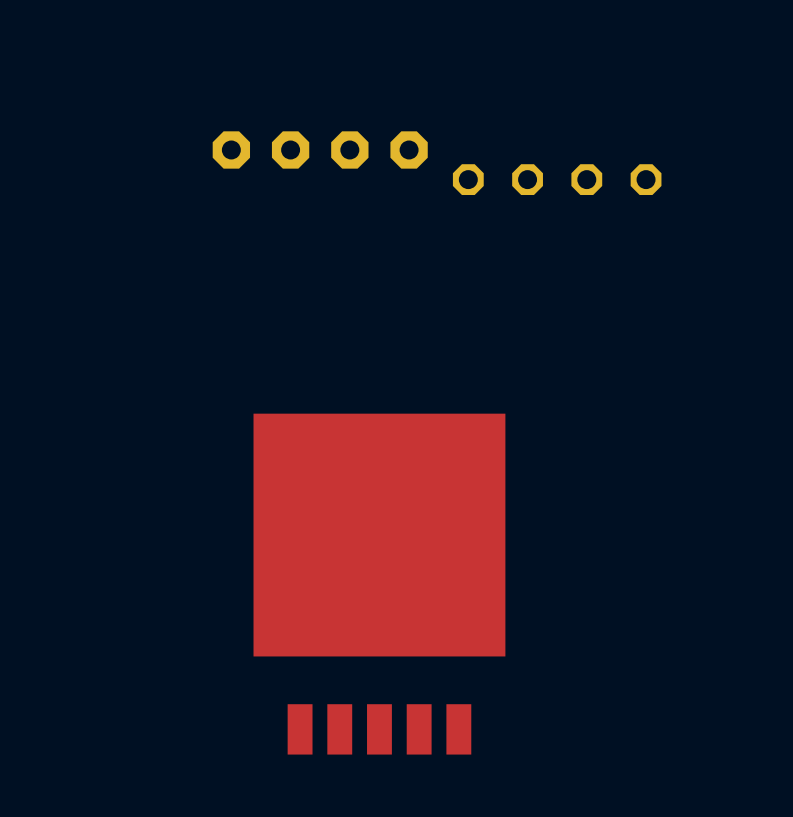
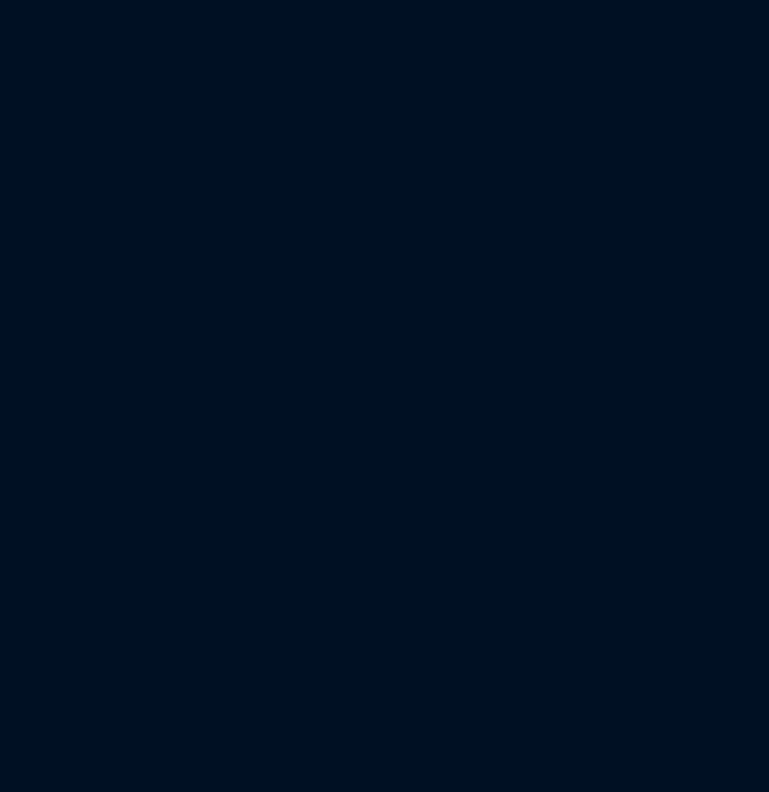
part: (260, 149) -> none
part: (379, 149) -> none
part: (497, 179) -> none
part: (616, 179) -> none
part: (379, 584) -> none

